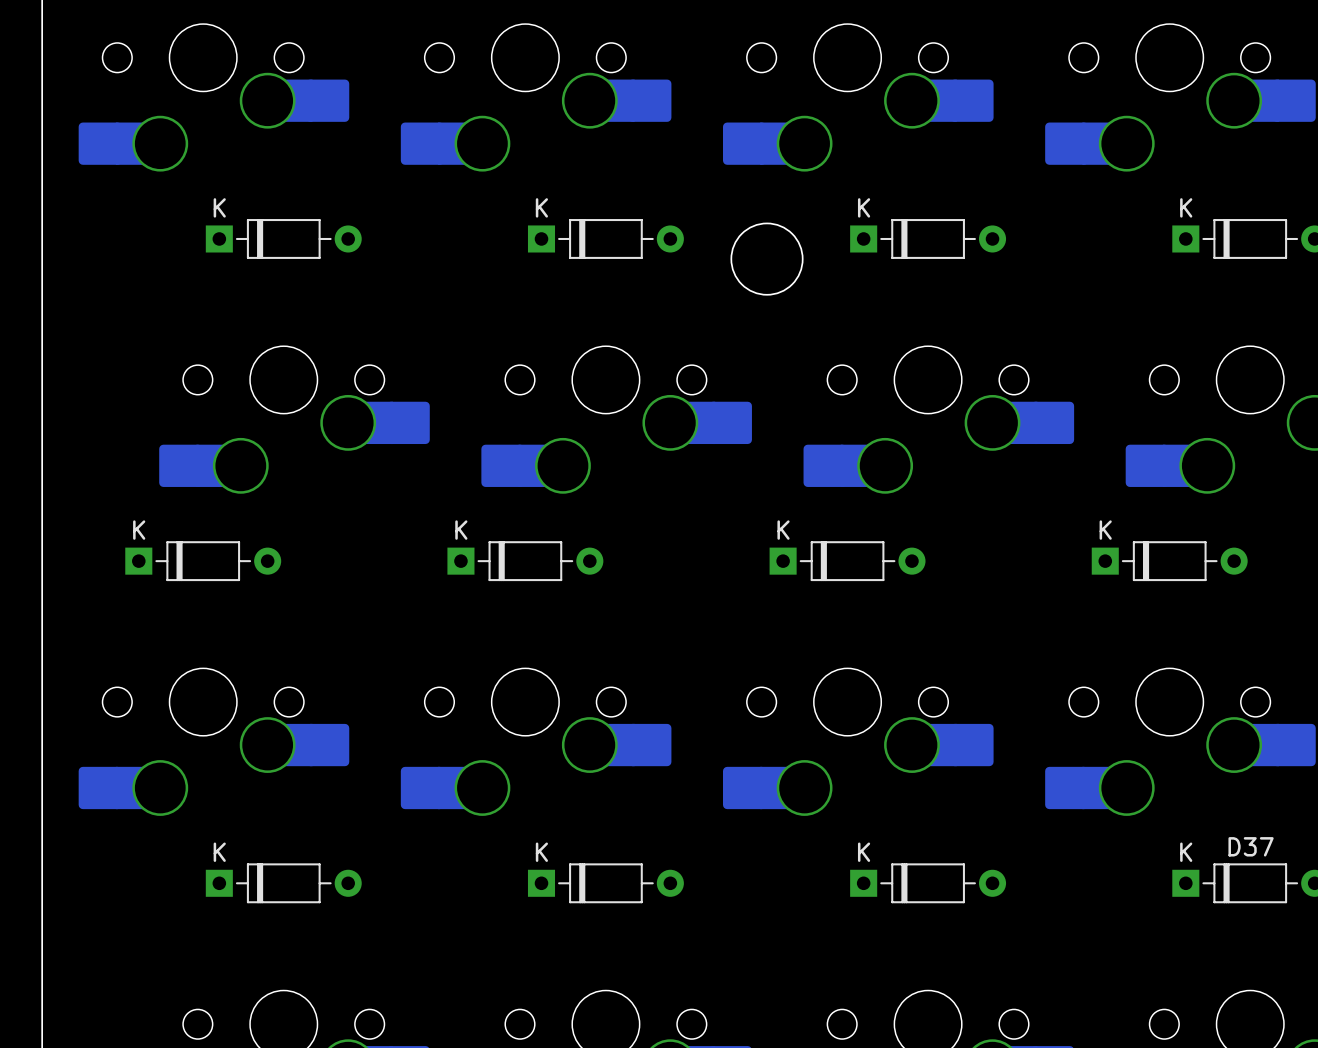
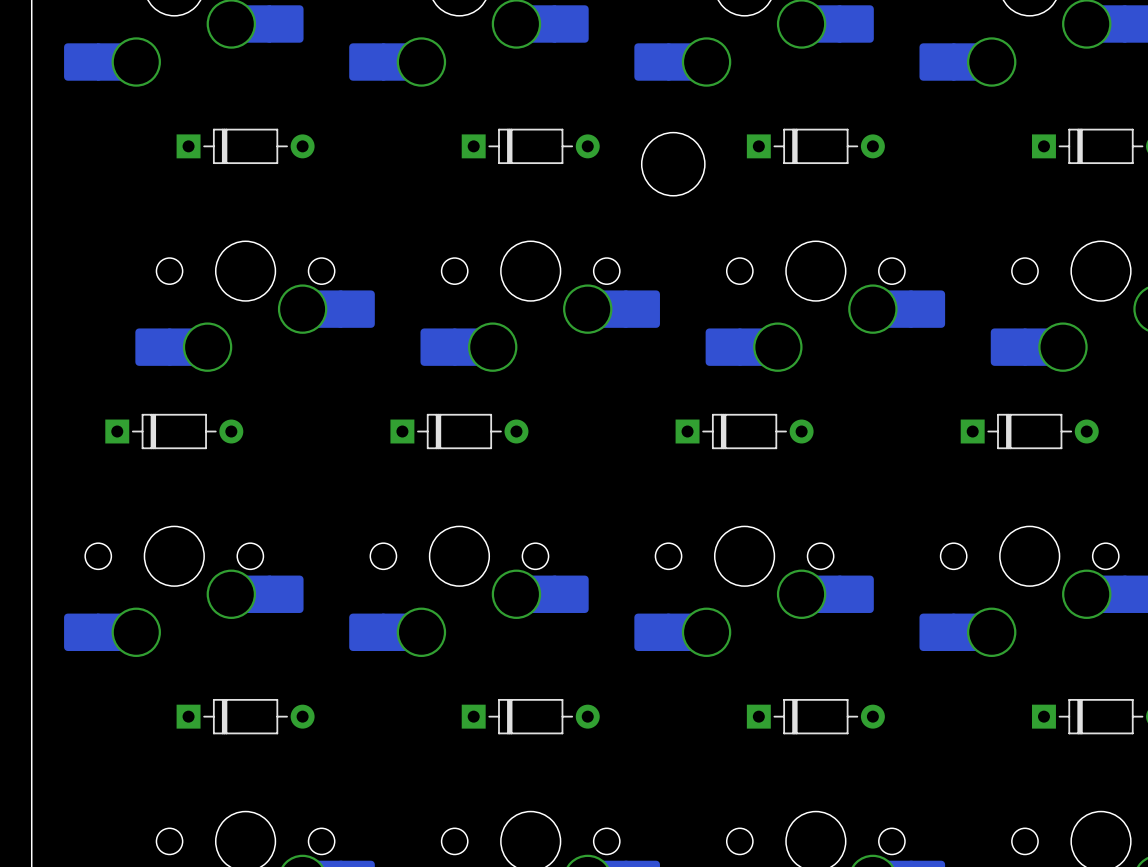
part text: K (219, 207) -> none
part text: K (541, 207) -> none
part text: K (864, 207) -> none
part text: K (1186, 207) -> none
part text: K (139, 530) -> none
part text: K (461, 530) -> none
part text: K (783, 530) -> none
part text: K (1105, 530) -> none
D37 name: D37 (1251, 846) -> none
part text: K (219, 852) -> none
part text: K (541, 852) -> none
part text: K (864, 852) -> none
D37 text: K (1186, 852) -> none

